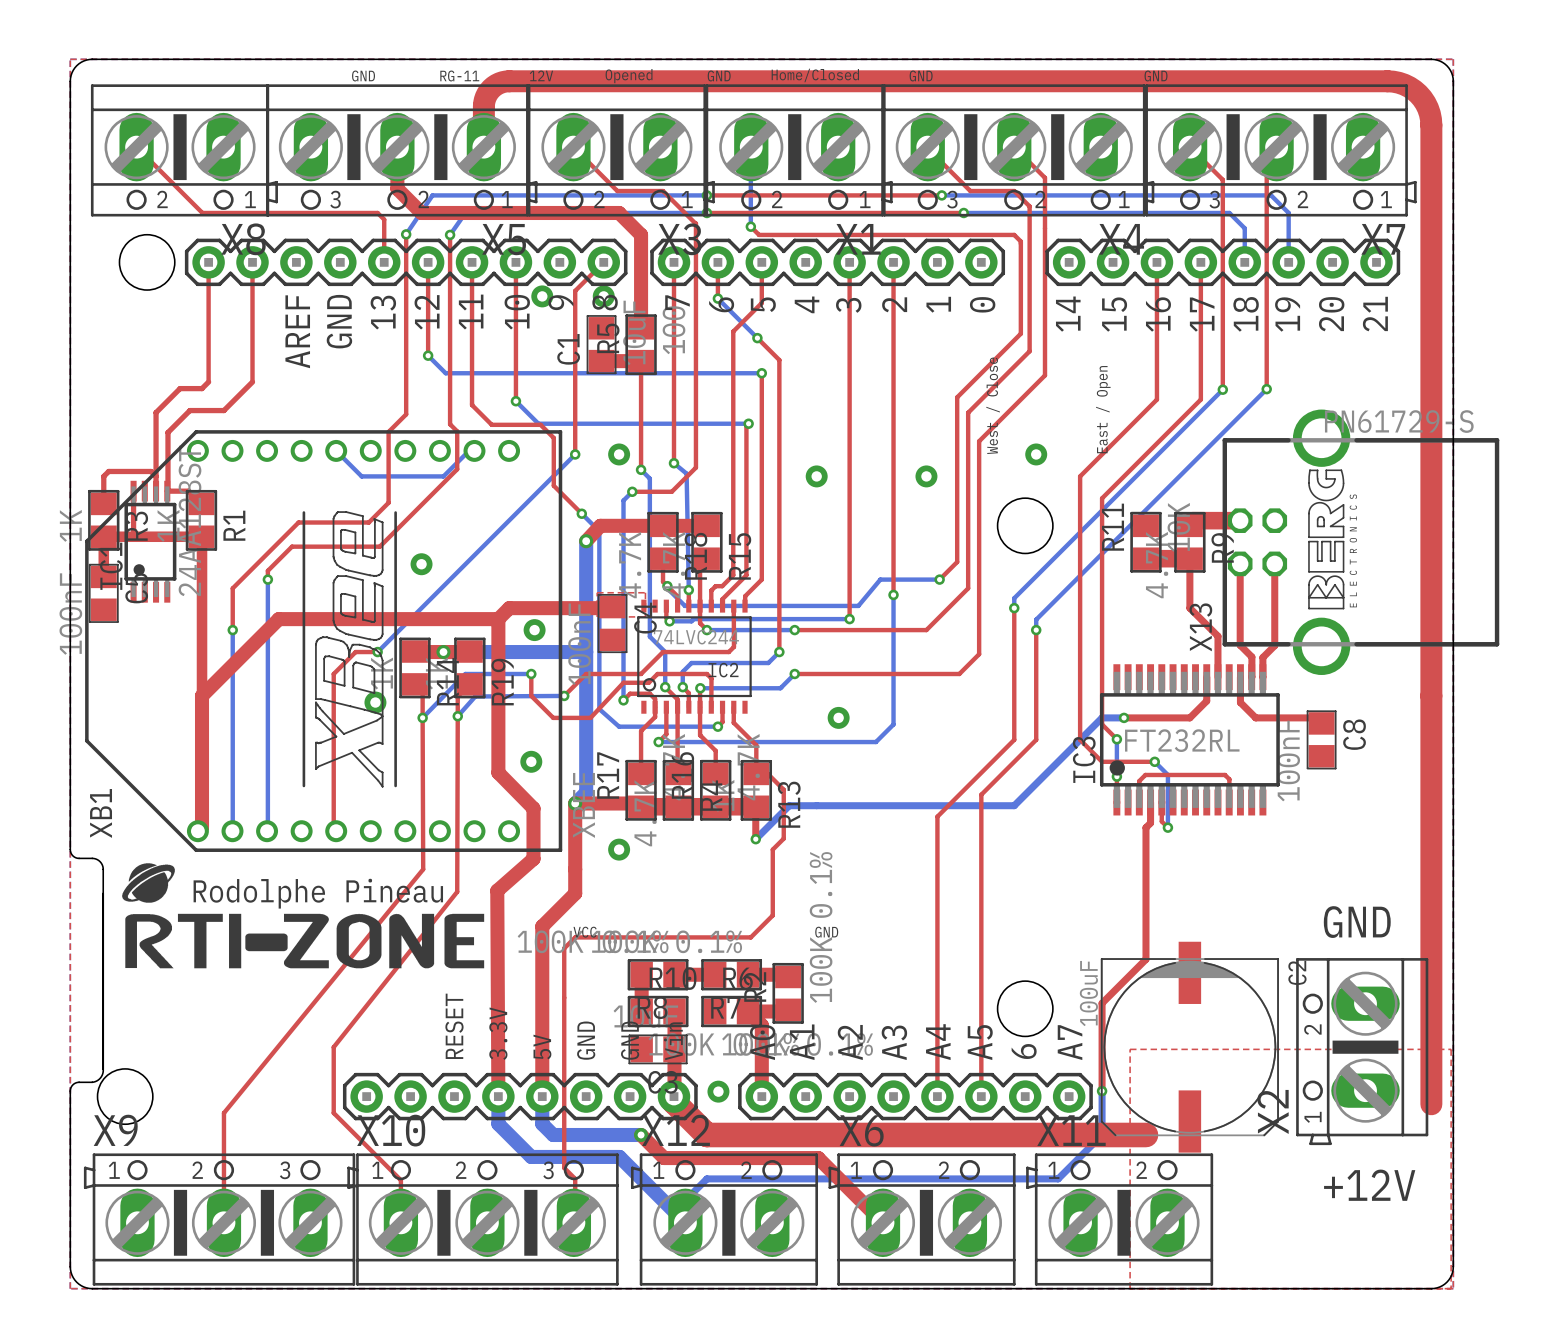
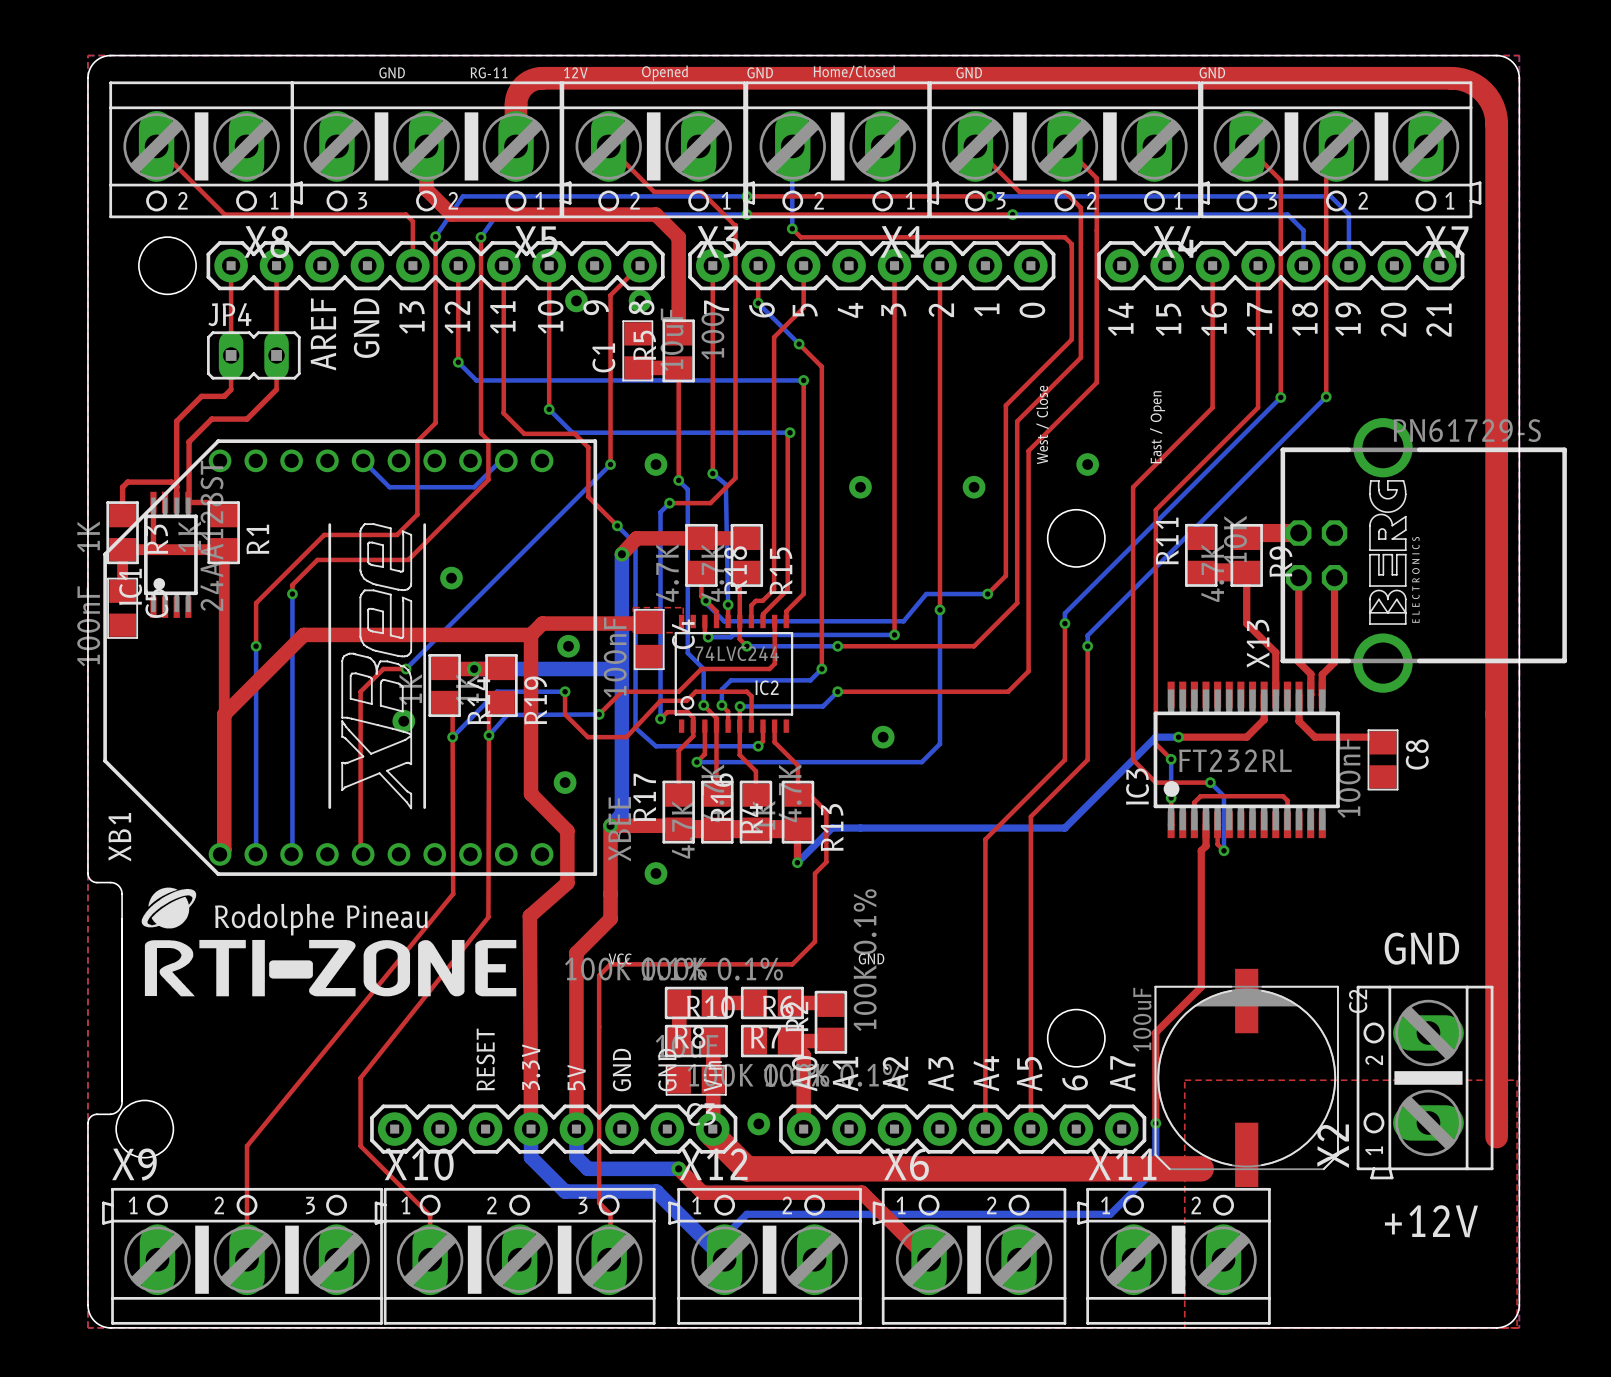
JP4: none -> (253, 355)

